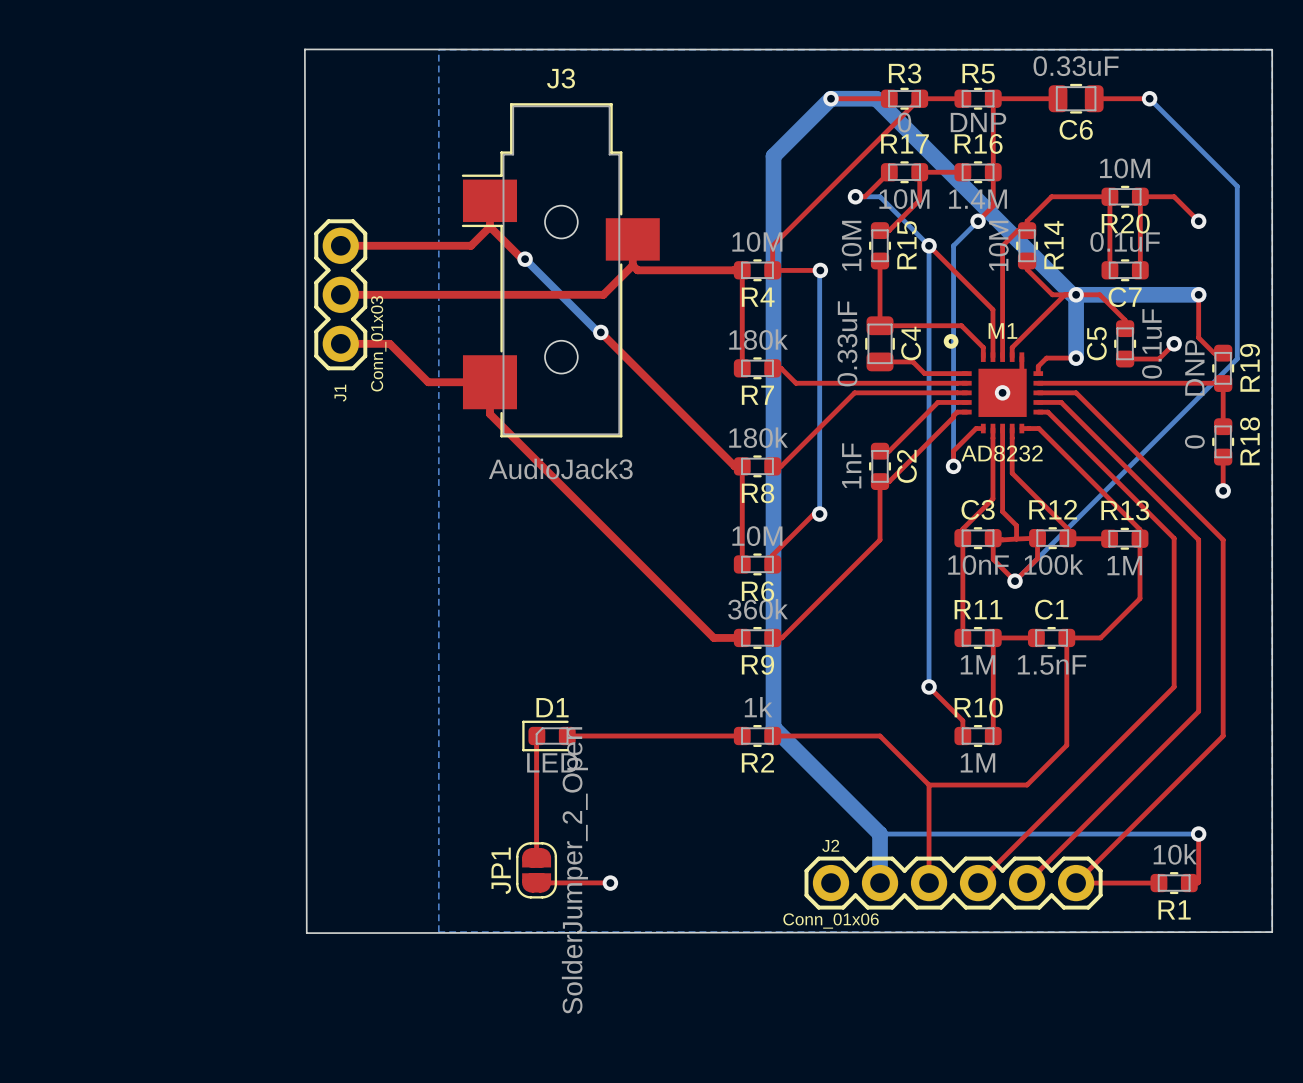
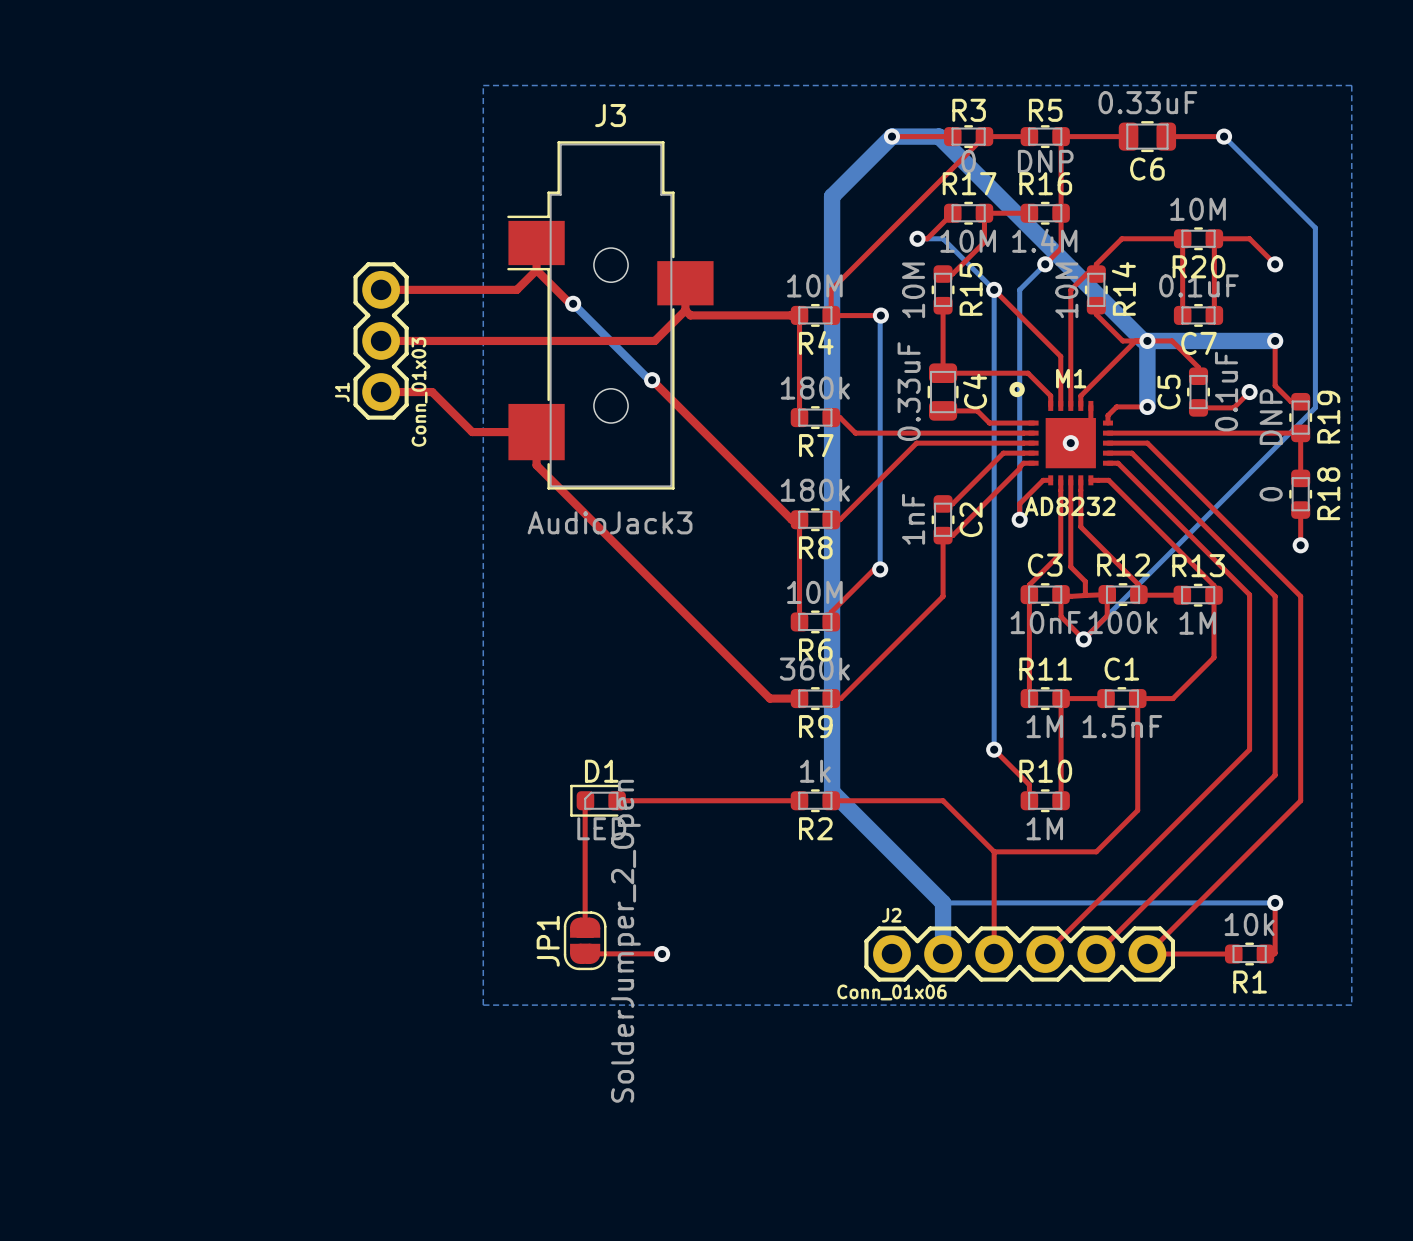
board edge: (304, 49) (306, 933) (1272, 932) (1272, 49) (304, 49) -> none
J1 name position: J1 (340, 393) -> J1 (342, 392)

